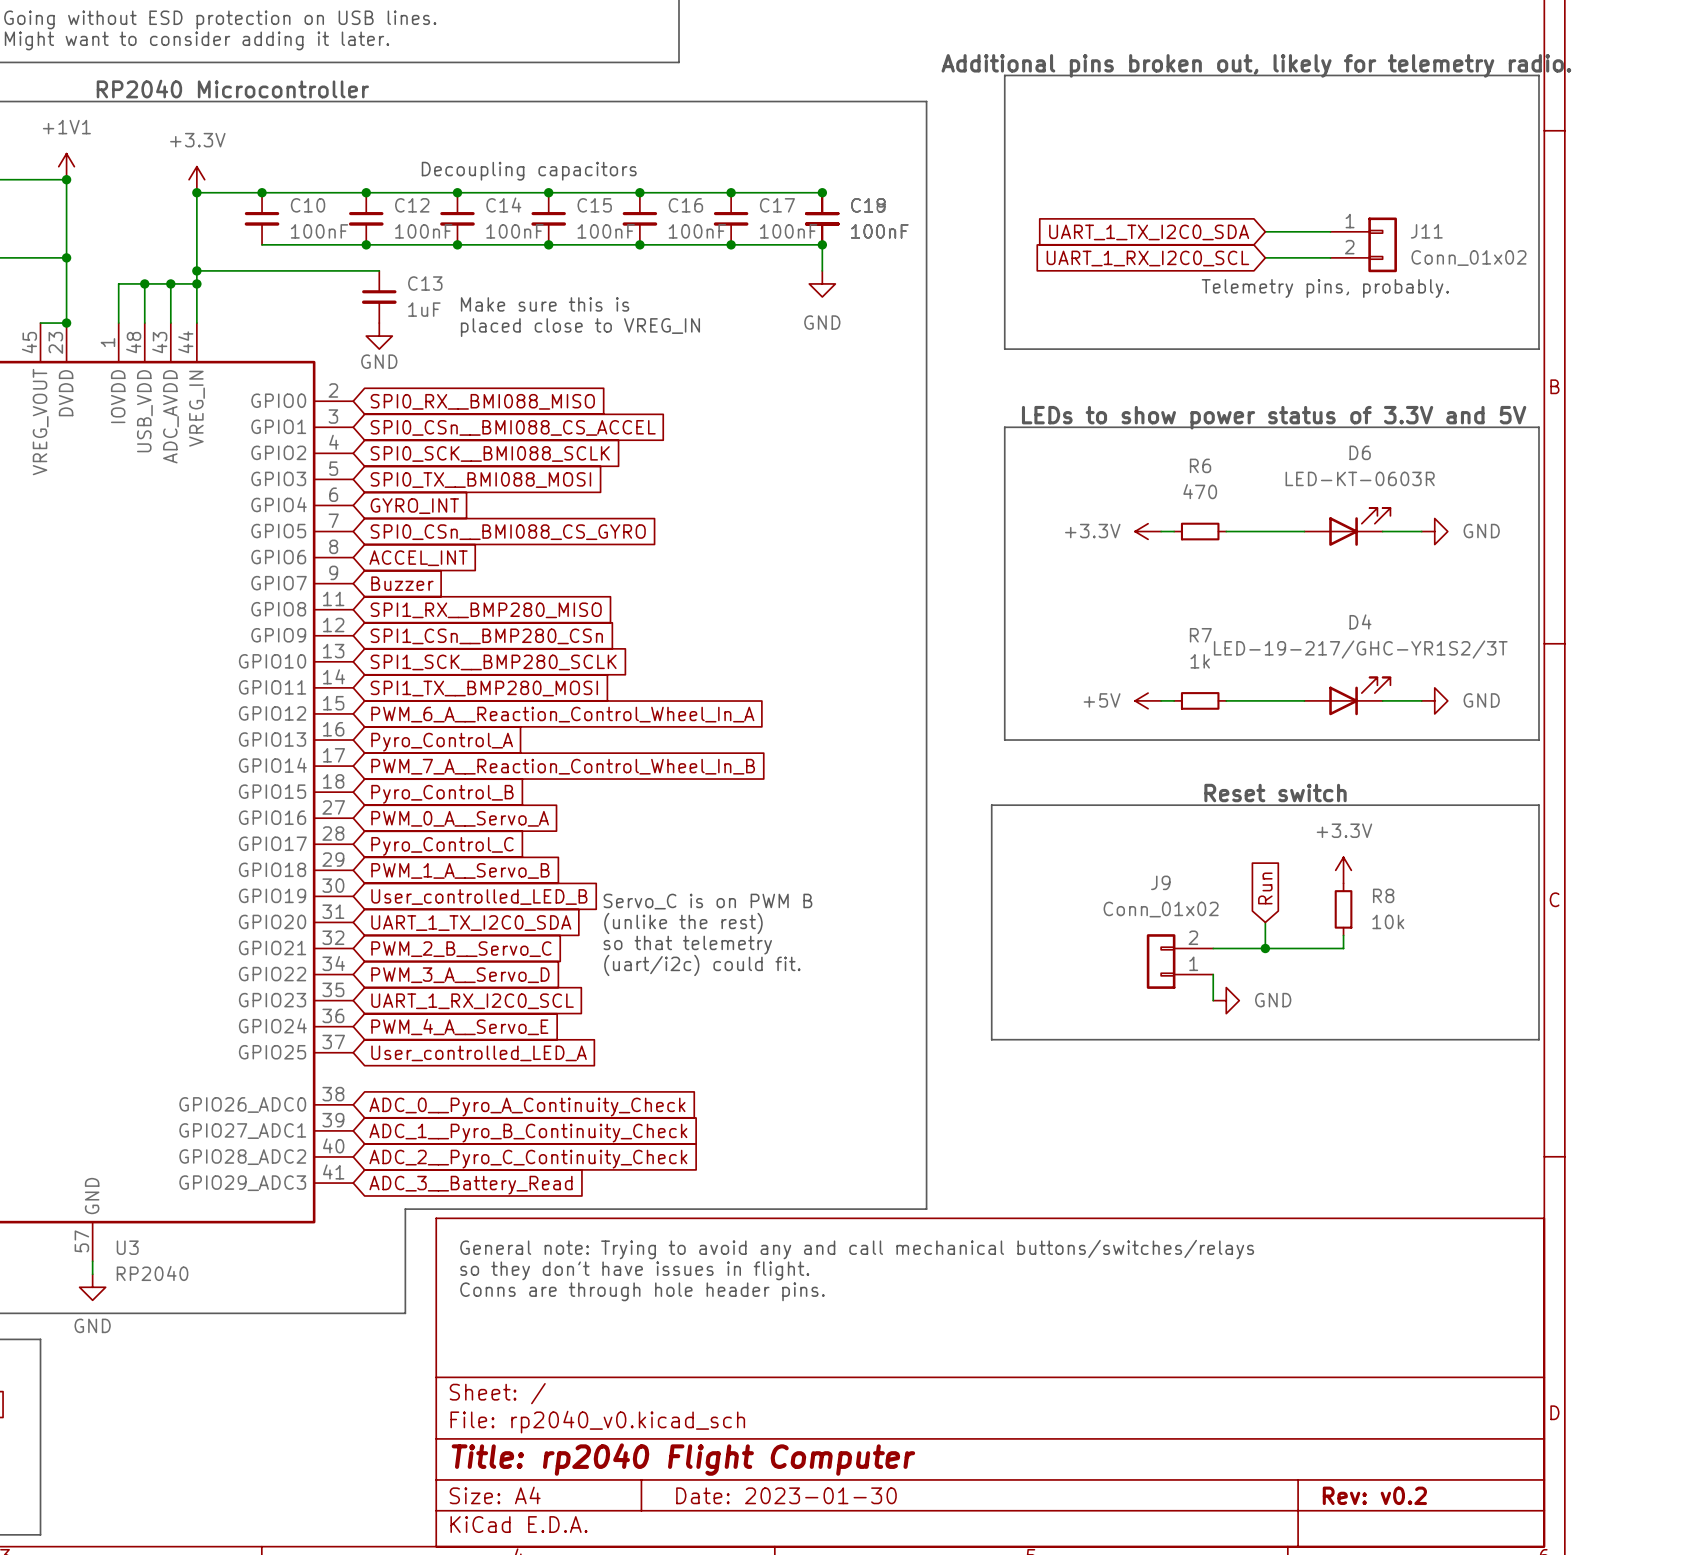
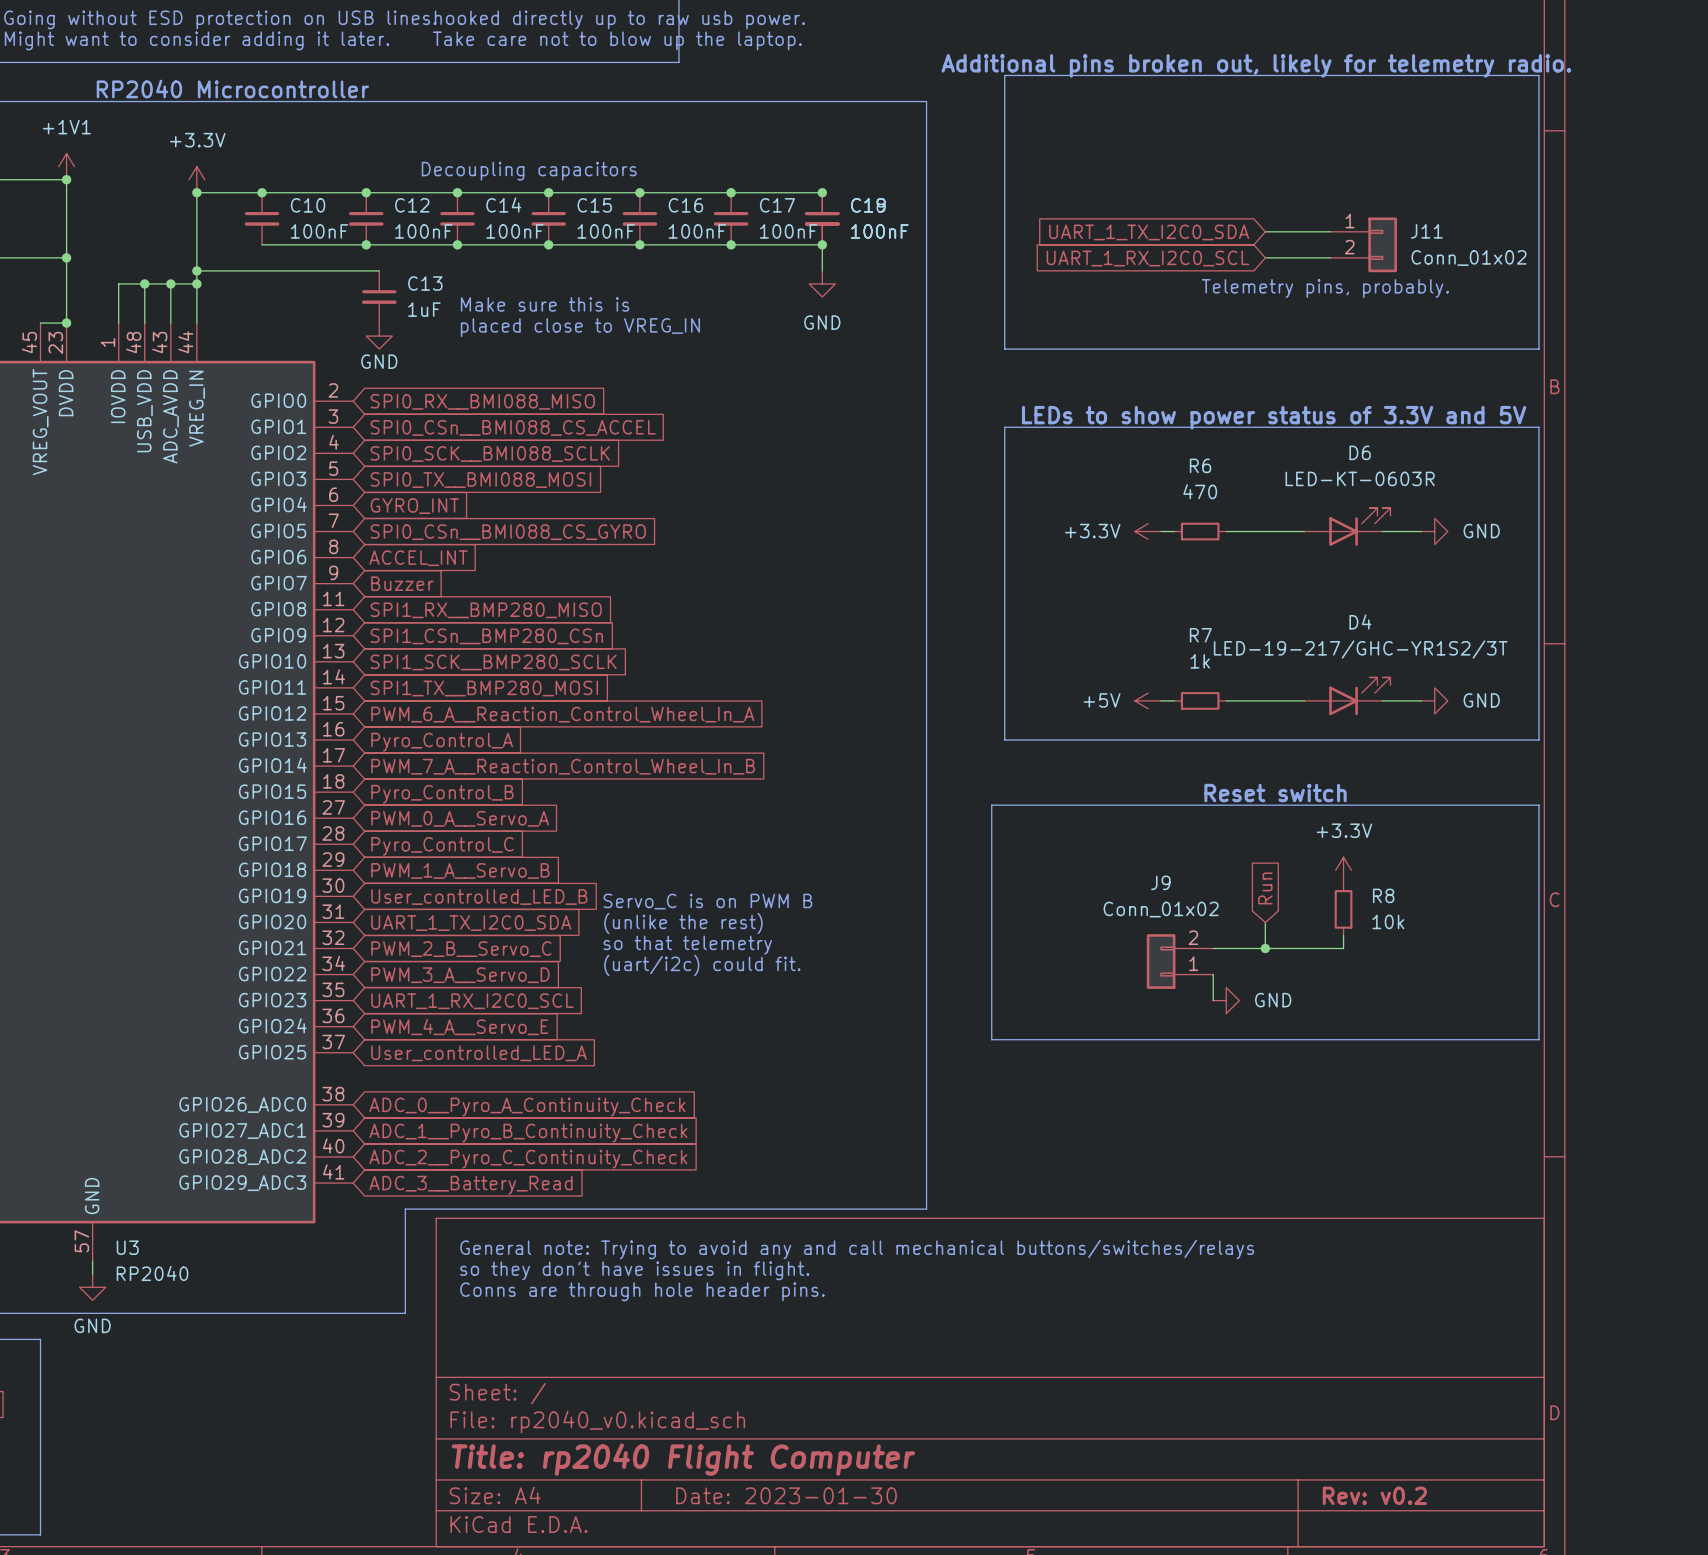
text: none -> hooked directly up to raw usb power. (619, 19)
text: none -> Take care not to blow up the laptop. (617, 40)

